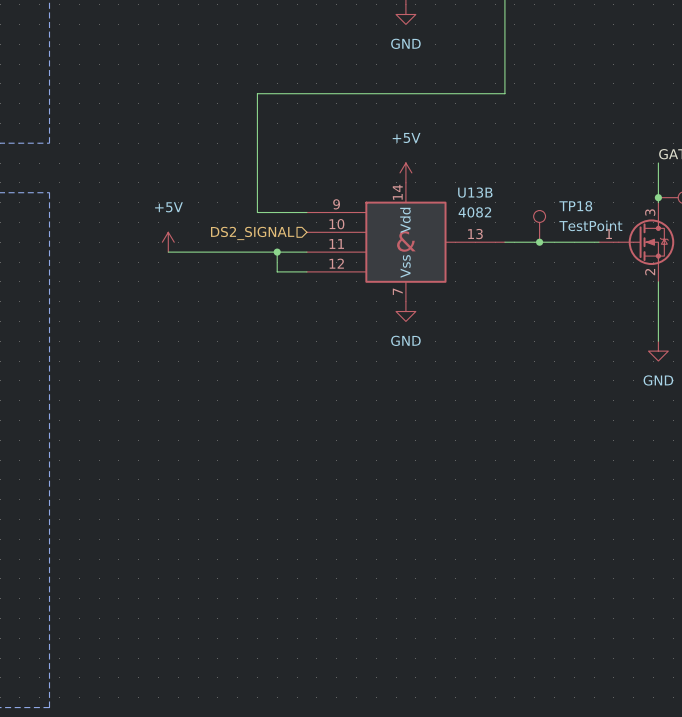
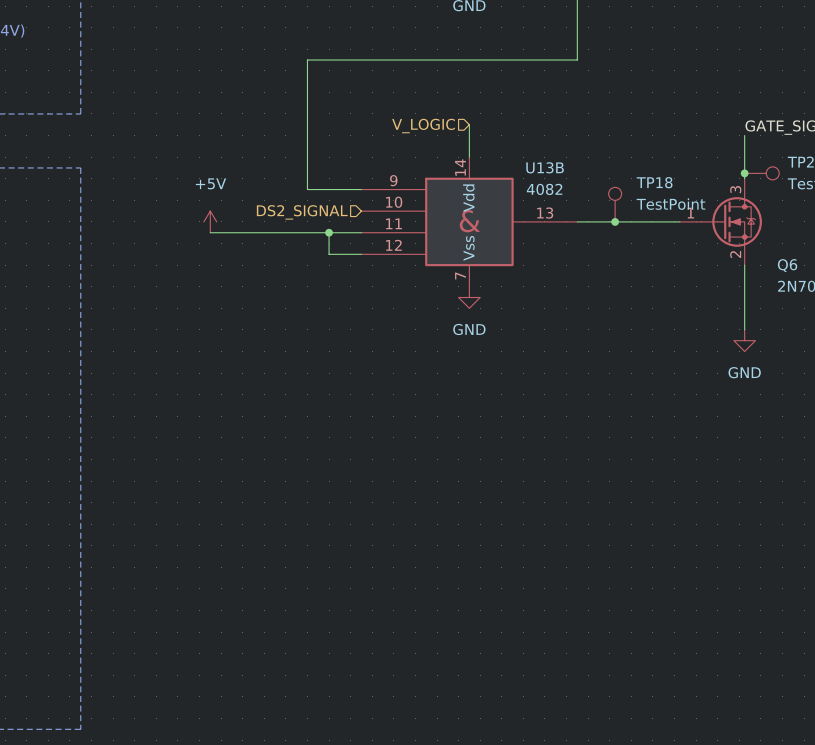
hierarchical label: none -> V_LOGIC (423, 126)
power symbol: +5V (405, 172) -> none

